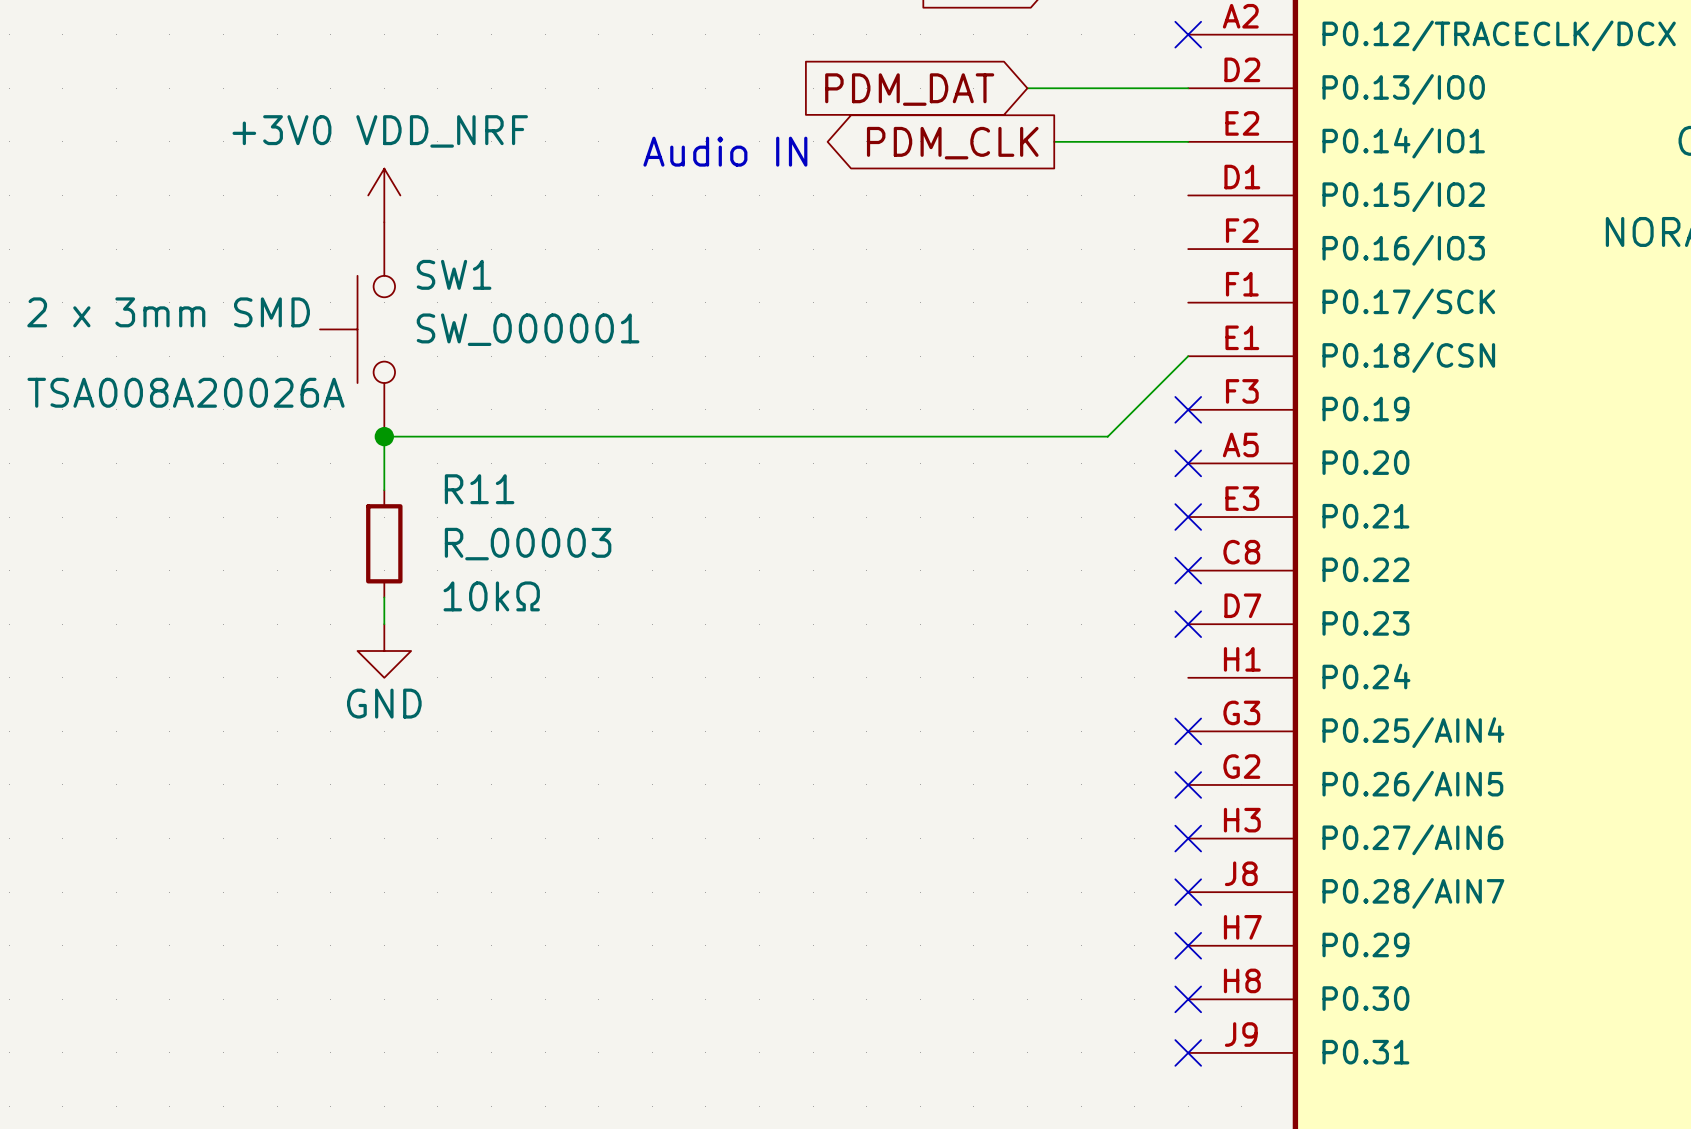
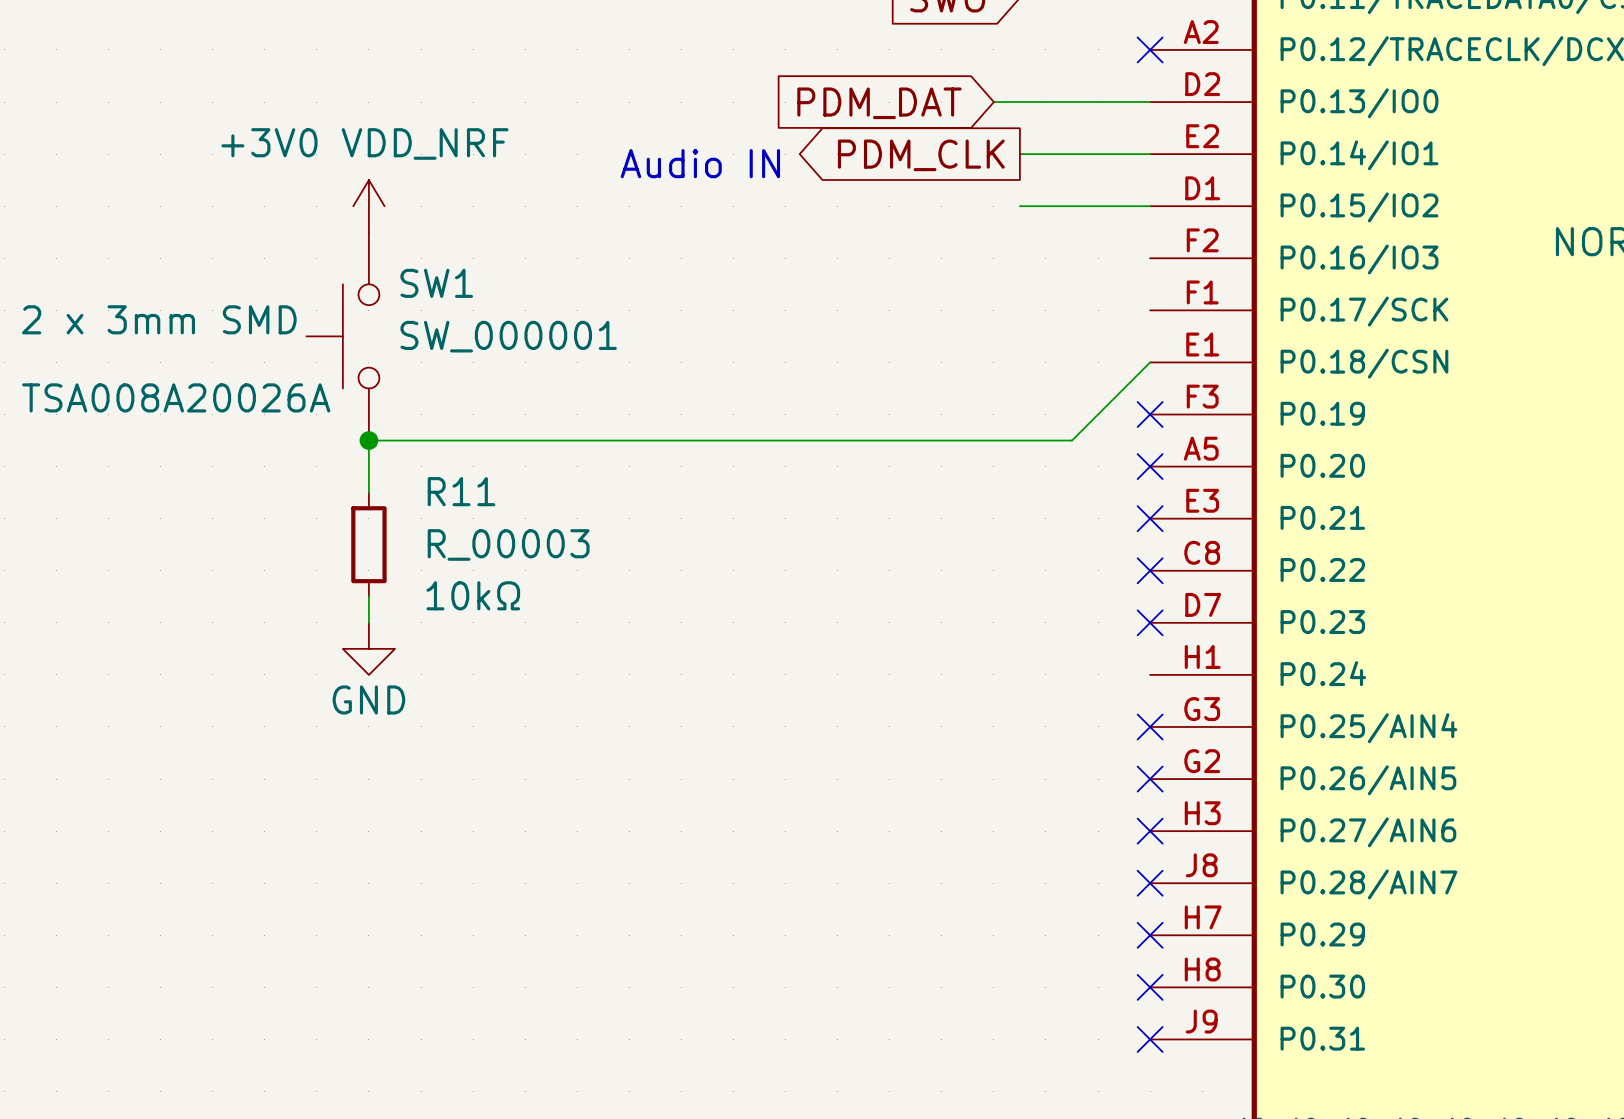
wire: none -> (1019, 206) (1150, 206)

